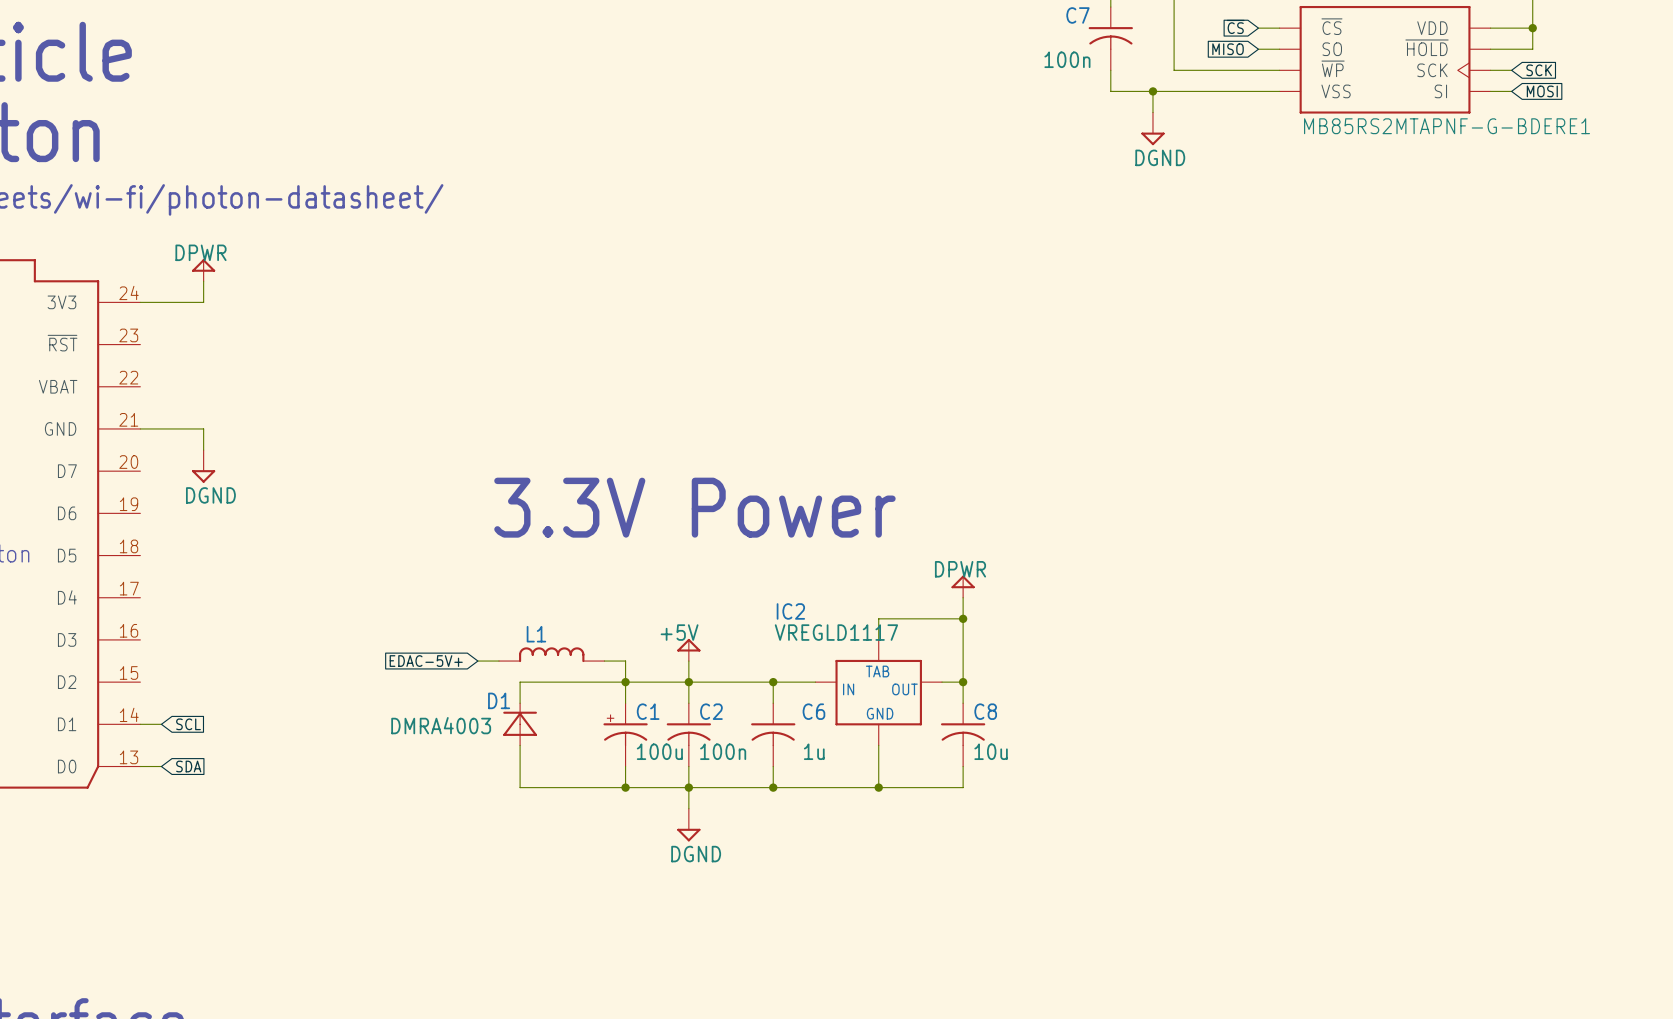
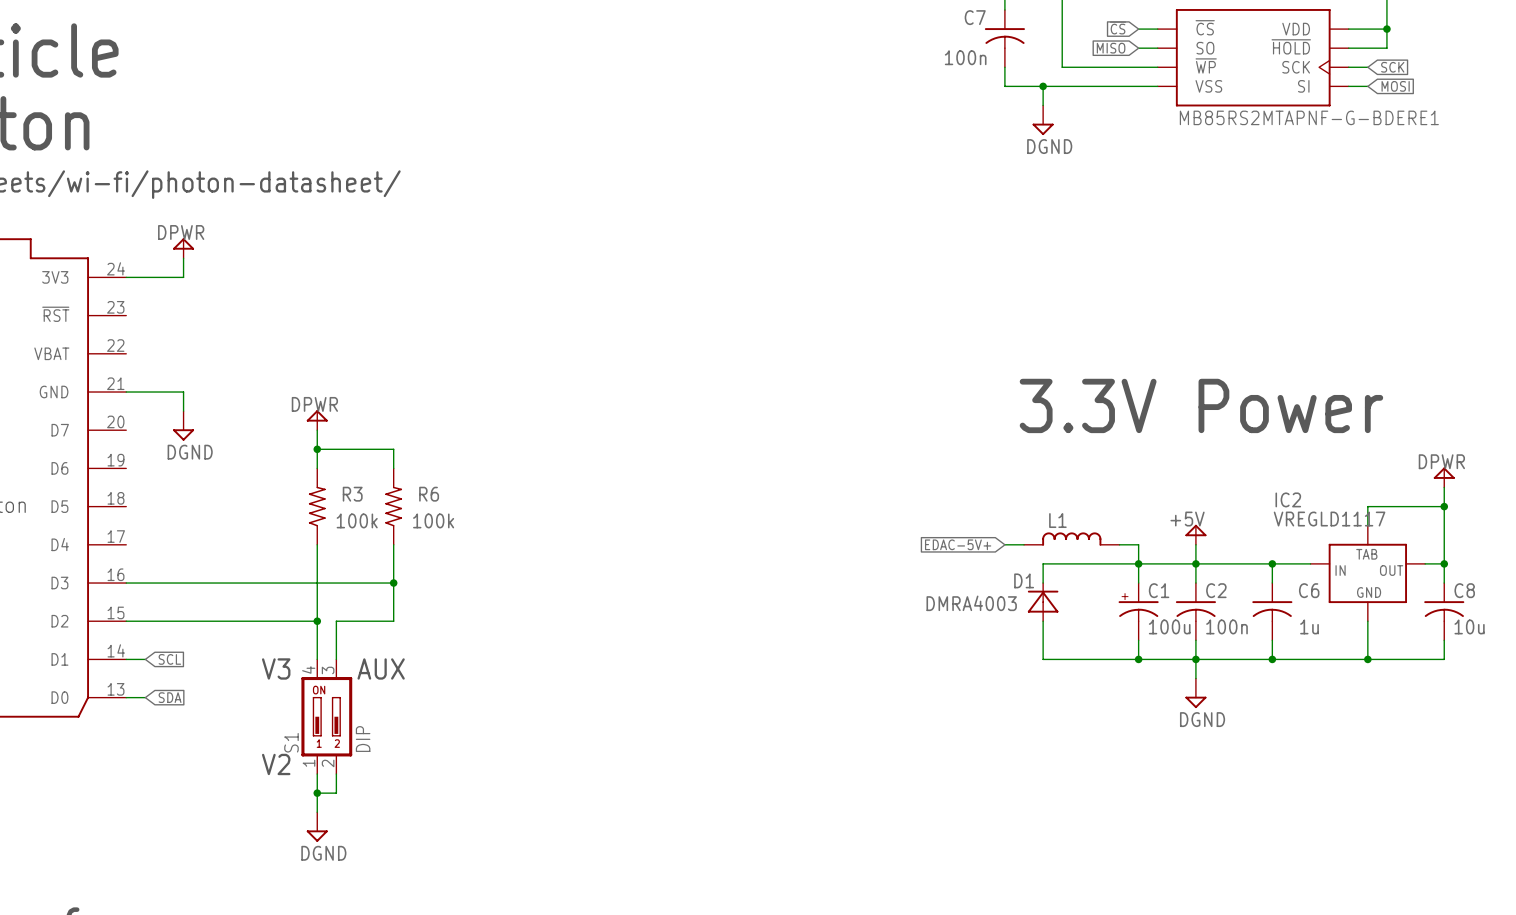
text: none -> 3.3V Power (1201, 405)
power symbol: none -> DPWR (317, 420)
wire: none -> (317, 430) (317, 468)
wire: none -> (317, 449) (393, 449) (393, 468)
junction: none -> (317, 449)
text: 3.3V Power (694, 507) -> none
power symbol: none -> DPWR (1444, 477)
wire: none -> (1444, 487) (1444, 583)
R3: none -> 100k (317, 506)
R6: none -> 100k (393, 506)
wire: none -> (1444, 506) (1367, 506) (1367, 525)
junction: none -> (1444, 506)
power symbol: DPWR (963, 586) -> none
power symbol: none -> +5V (1195, 534)
wire: none -> (317, 544) (317, 659)
wire: none -> (393, 544) (393, 621) (336, 621) (336, 659)
wire: (963, 597) (963, 703) -> none
global label: none -> EDAC-5V+ (958, 544)
wire: none -> (1119, 544) (1138, 544) (1138, 583)
wire: none -> (1195, 544) (1195, 583)
wire: (963, 618) (878, 618) (878, 639) -> none
junction: (963, 618) -> none
junction: none -> (1138, 563)
junction: none -> (1195, 563)
wire: none -> (1272, 563) (1272, 583)
junction: none -> (1272, 563)
wire: none -> (1310, 563) (1043, 563) (1043, 583)
wire: none -> (1425, 563) (1444, 563)
junction: none -> (1444, 563)
wire: none -> (126, 583) (393, 583)
junction: none -> (393, 583)
power symbol: +5V (688, 649) -> none
L1 position: (551, 654) -> (1071, 539)
global label: EDAC-5V+ (426, 661) -> none
wire: (477, 661) (498, 661) -> none
wire: (604, 661) (625, 661) (625, 703) -> none
wire: (688, 661) (688, 703) -> none
wire: none -> (126, 621) (317, 621)
junction: none -> (317, 621)
junction: (625, 682) -> none
junction: (688, 682) -> none
wire: (773, 682) (773, 703) -> none
junction: (773, 682) -> none
wire: (815, 682) (520, 682) (520, 703) -> none
wire: (942, 682) (963, 682) -> (1004, 544) (1024, 544)
junction: (963, 682) -> none
wire: none -> (1043, 621) (1043, 659) (1444, 659) (1444, 640)
wire: none -> (1367, 621) (1367, 659)
IC2 position: (878, 692) -> (1367, 573)
wire: none -> (1138, 640) (1138, 659)
wire: none -> (1195, 640) (1195, 678)
wire: none -> (1272, 640) (1272, 659)
D1 position: (520, 724) -> (1043, 602)
junction: none -> (1138, 659)
junction: none -> (1195, 659)
junction: none -> (1272, 659)
junction: none -> (1367, 659)
text: none -> V3 (276, 668)
text: none -> AUX (381, 668)
C1 position: (625, 734) -> (1138, 611)
C2 position: (688, 734) -> (1195, 611)
C6 position: (773, 734) -> (1272, 611)
C8 position: (963, 734) -> (1444, 611)
wire: (520, 745) (520, 787) (963, 787) (963, 766) -> none
wire: (878, 745) (878, 787) -> none
power symbol: none -> DGND (1195, 693)
wire: (625, 766) (625, 787) -> none
wire: (688, 766) (688, 808) -> none
wire: (773, 766) (773, 787) -> none
S1: none -> DIP (326, 716)
junction: (625, 787) -> none
junction: (688, 787) -> none
junction: (773, 787) -> none
junction: (878, 787) -> none
power symbol: DGND (688, 825) -> none
text: none -> V2 (276, 764)
wire: none -> (317, 774) (317, 812)
wire: none -> (336, 774) (336, 793) (317, 793)
junction: none -> (317, 793)
power symbol: none -> DGND (317, 827)

